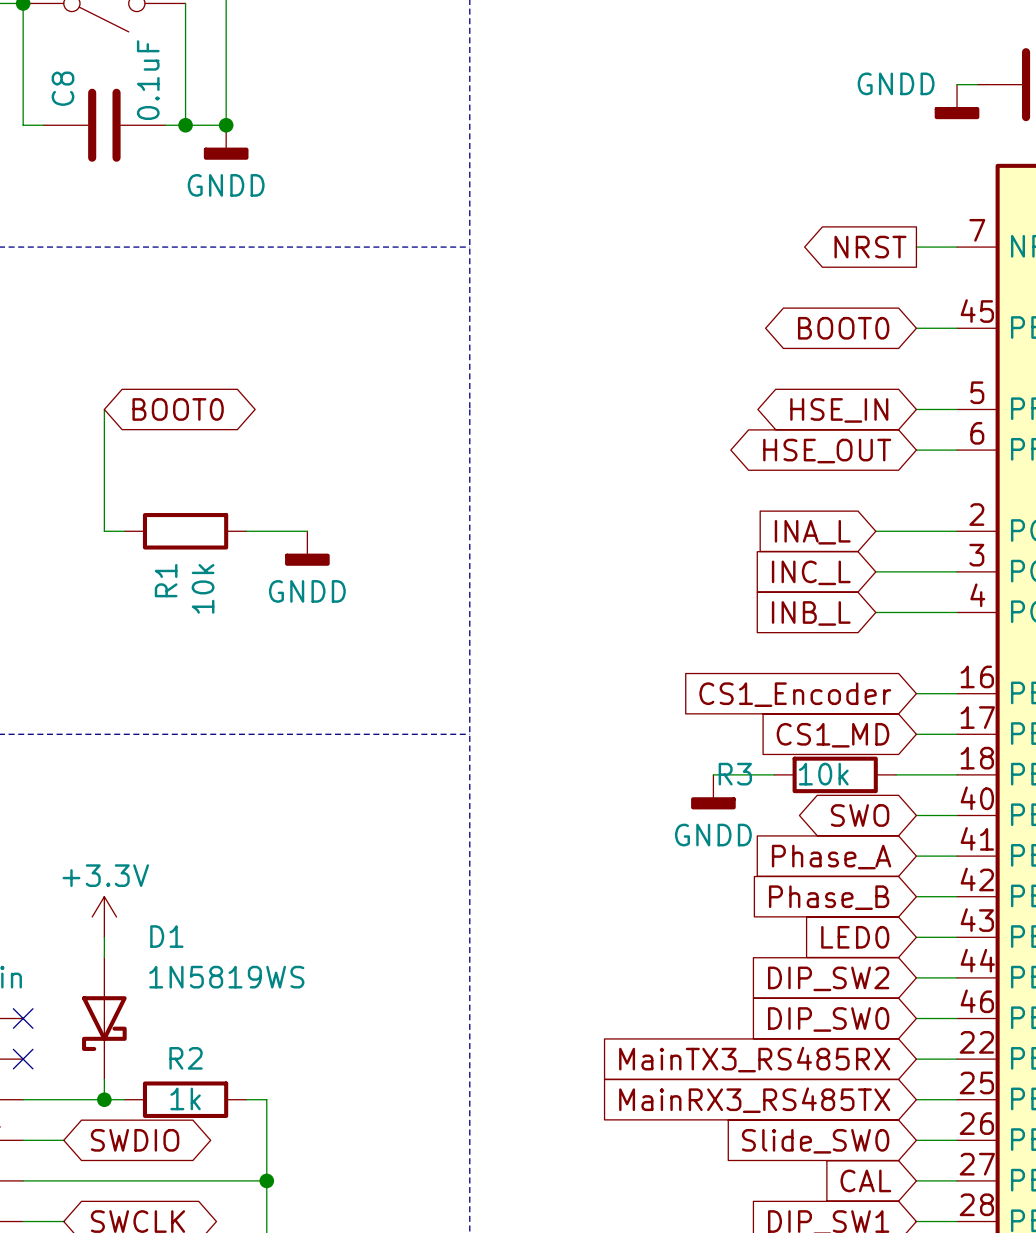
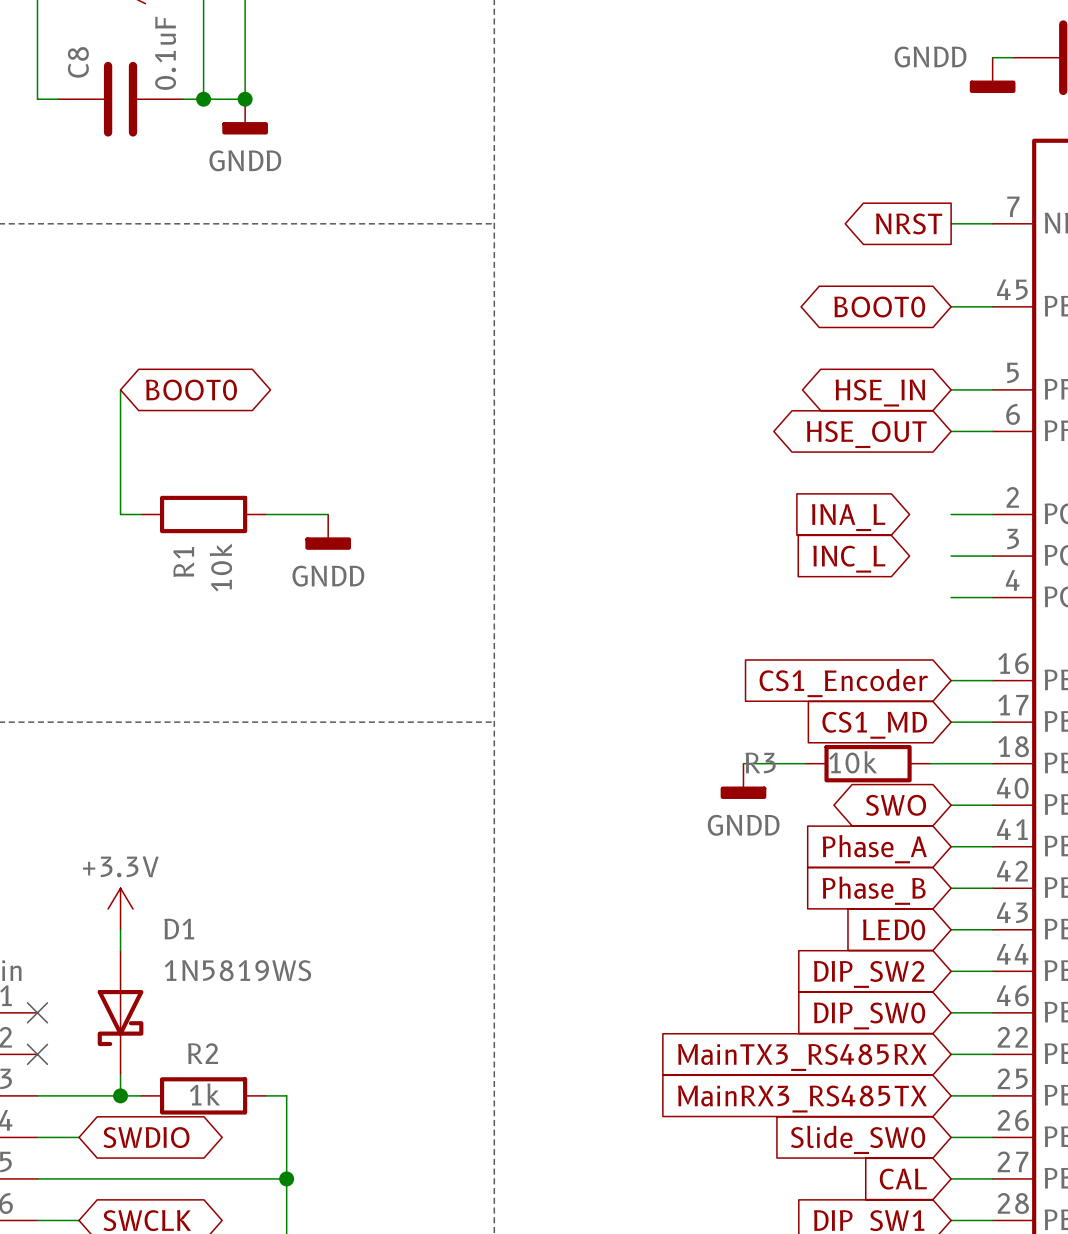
wire: (875, 531) (916, 531) -> none
wire: (875, 571) (916, 571) -> none
wire: (875, 612) (916, 612) -> none
global label: INB_L (811, 613) -> none

